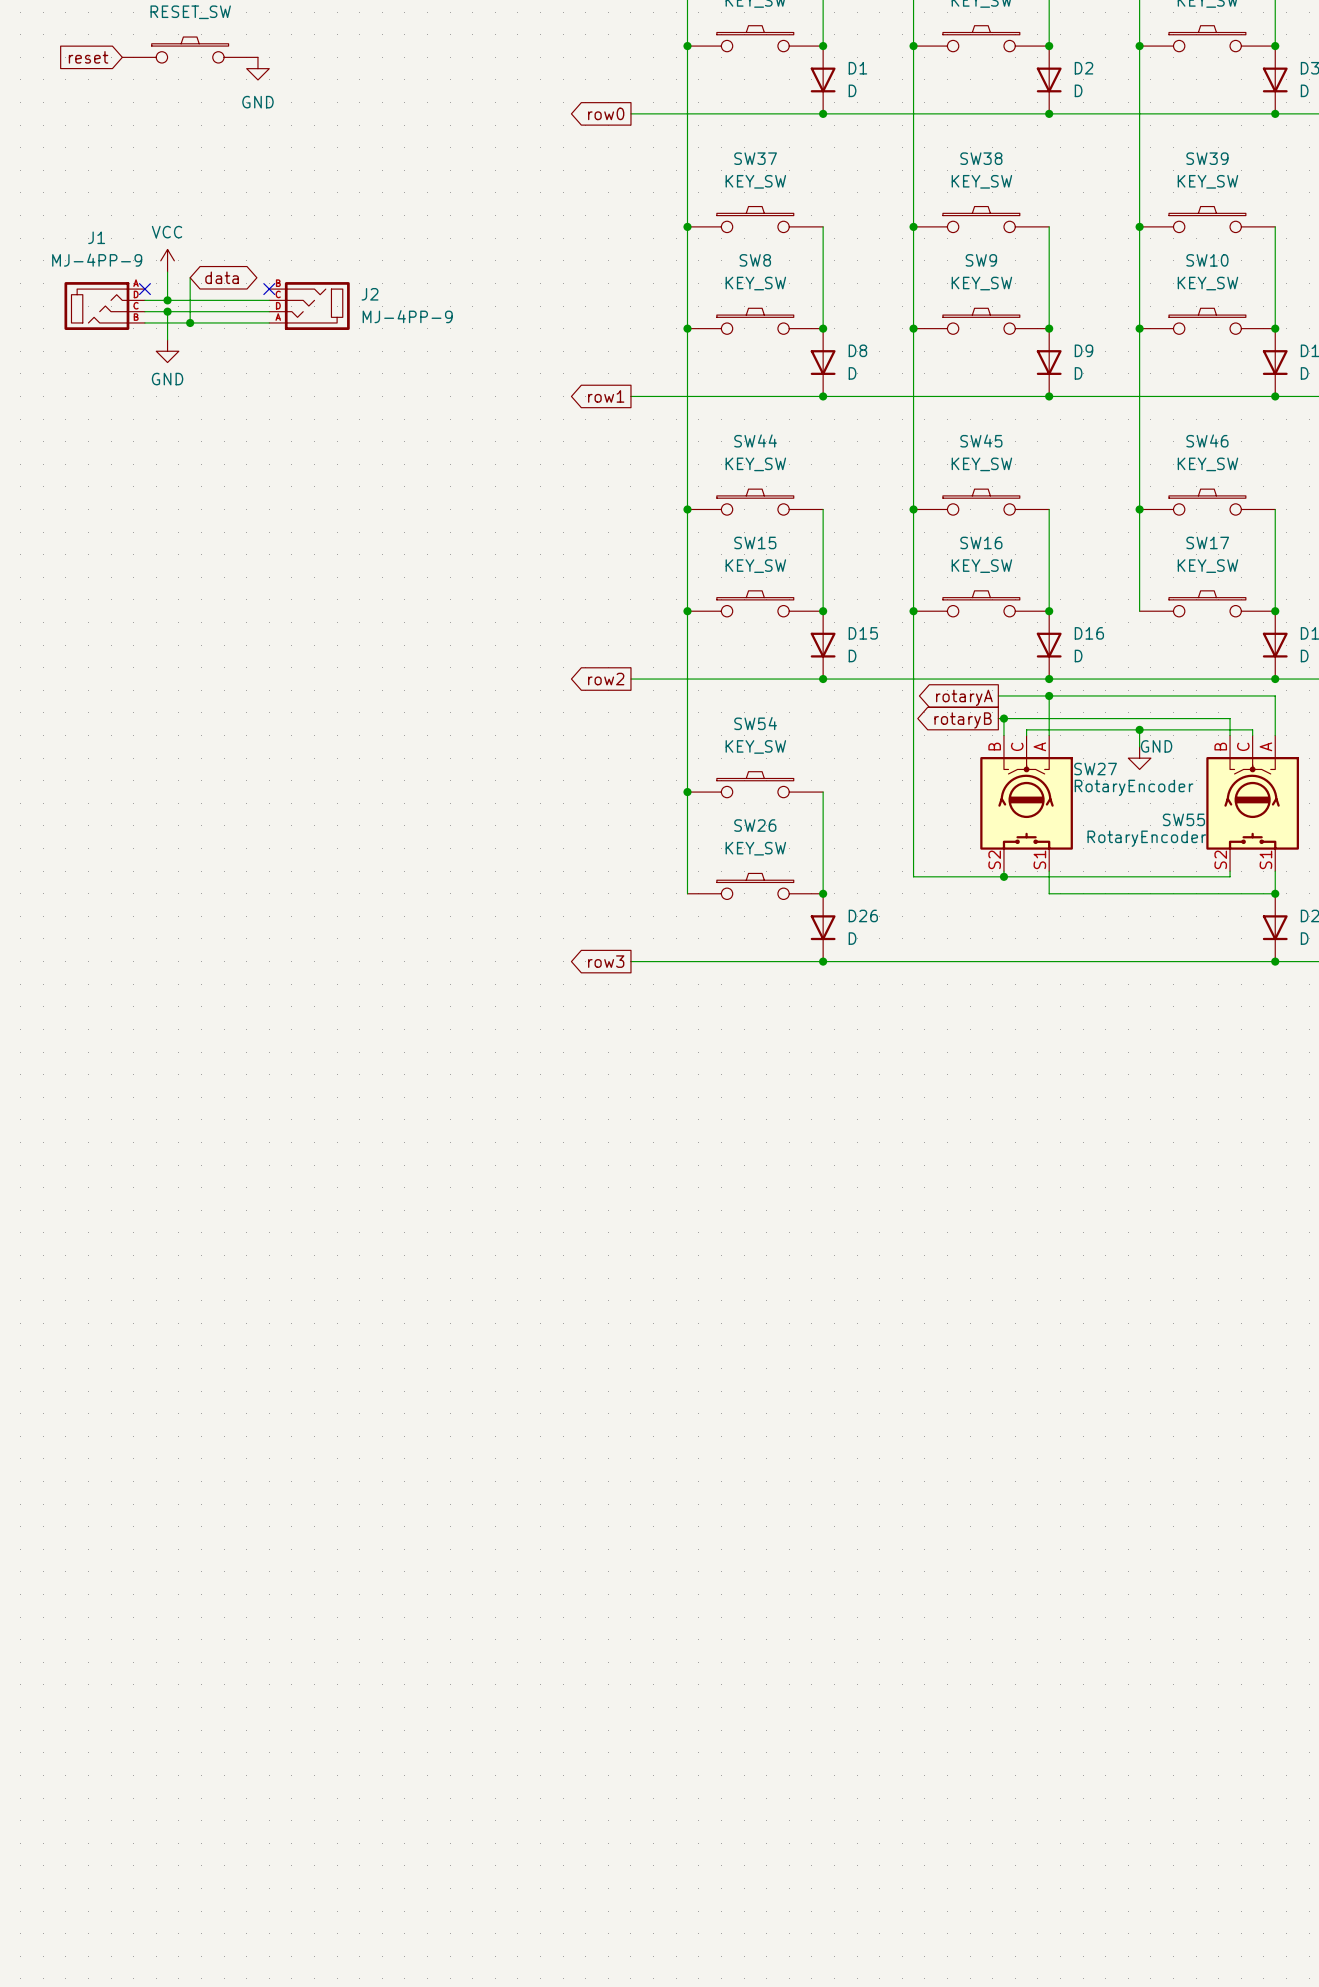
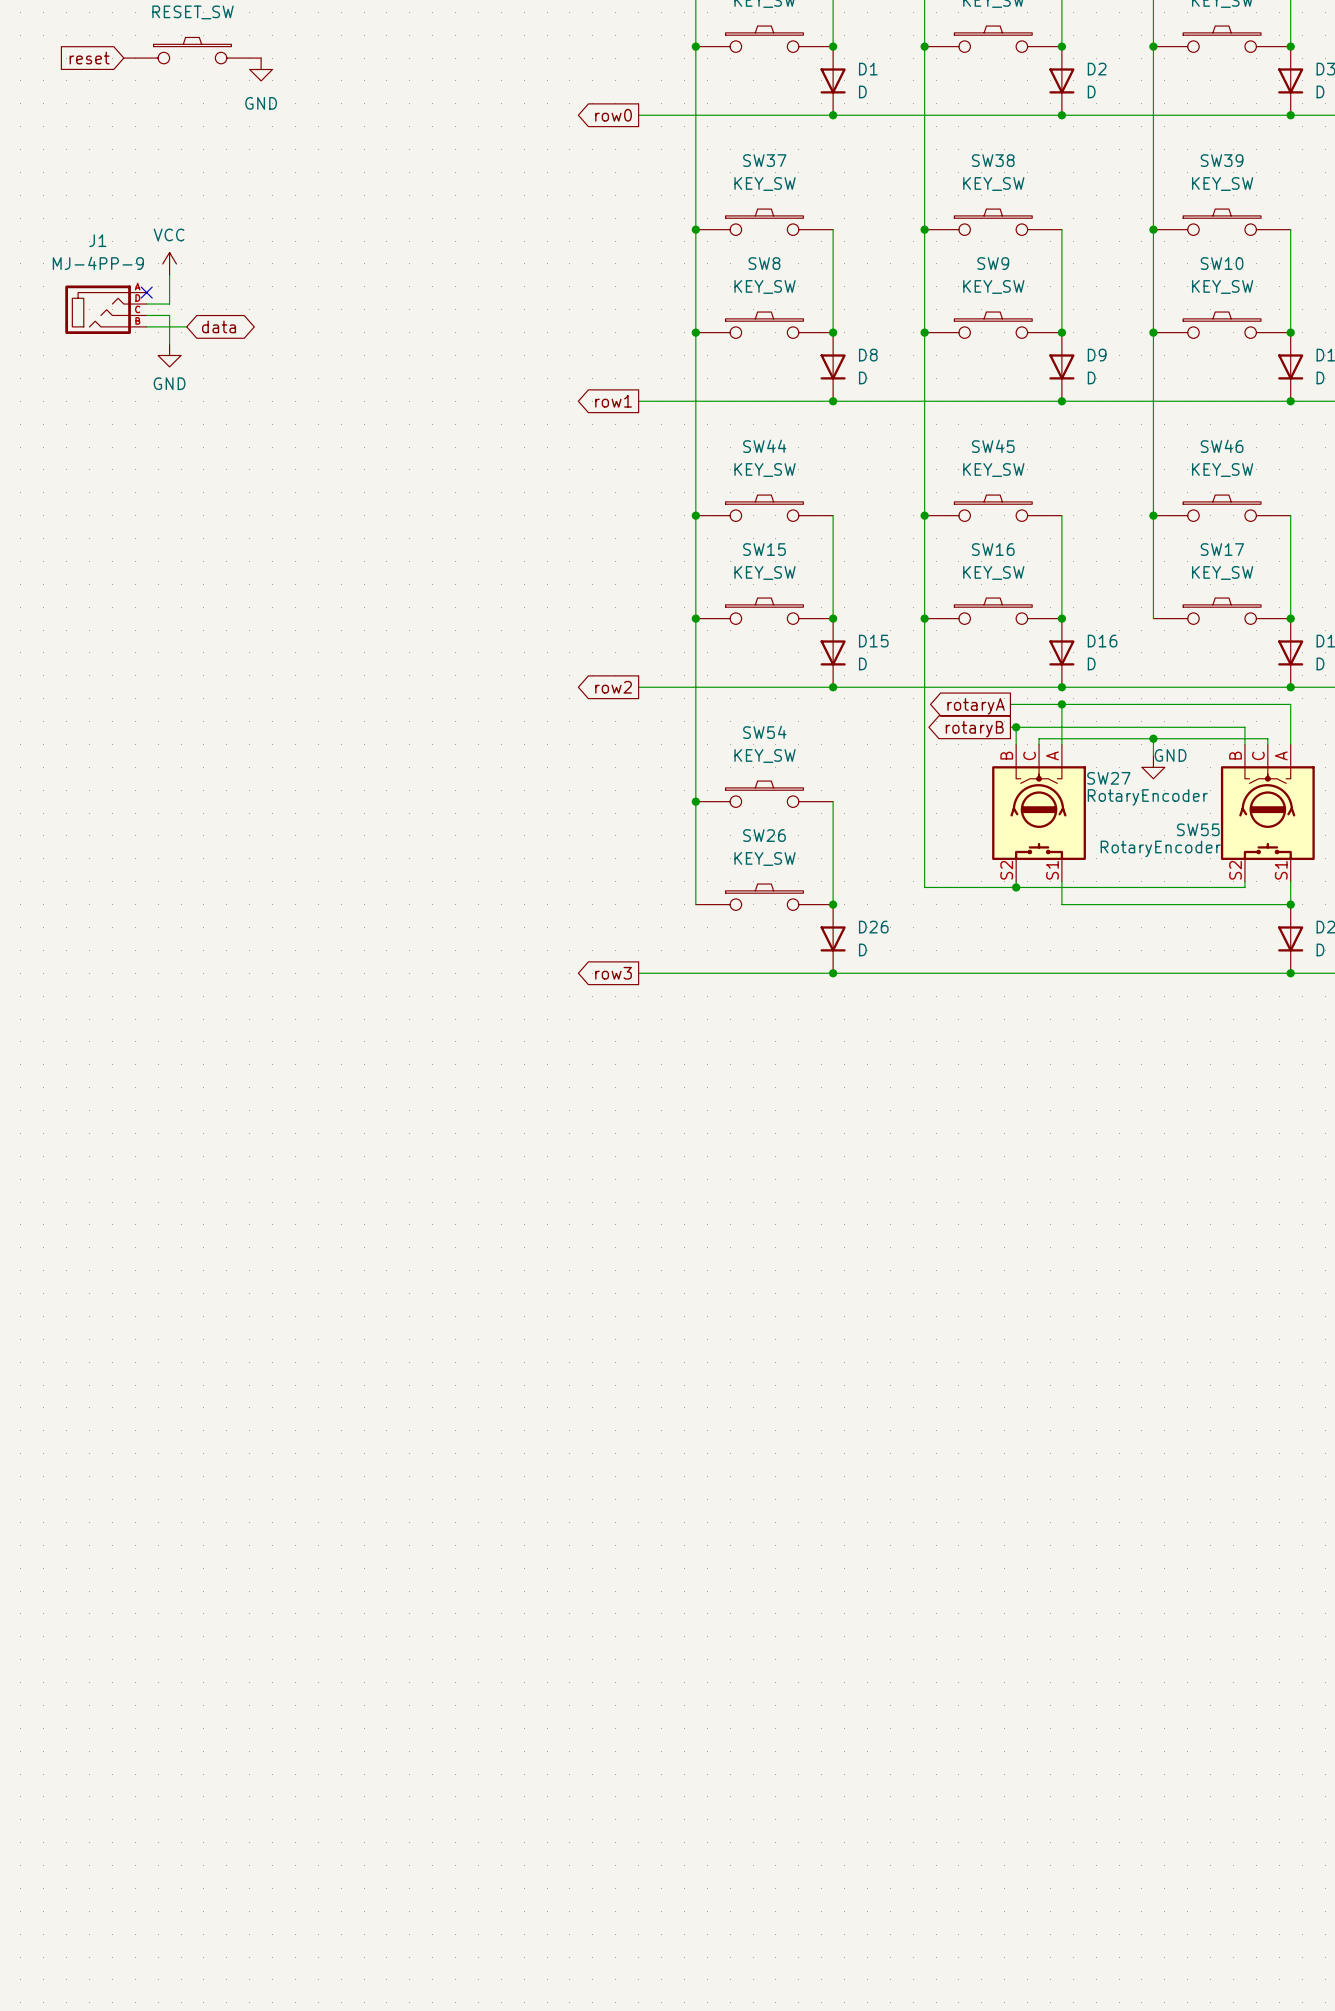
wire: (190, 277) (190, 322) -> none
global label position: data (222, 277) -> data (219, 326)
no-connect mark: (269, 289) -> none
wire: (167, 300) (269, 300) -> none
junction: (167, 300) -> none
J2: MJ-4PP-9 (309, 306) -> none
wire: (167, 311) (269, 311) -> none
junction: (167, 311) -> none
wire: (184, 322) (269, 322) -> none
junction: (190, 322) -> none

